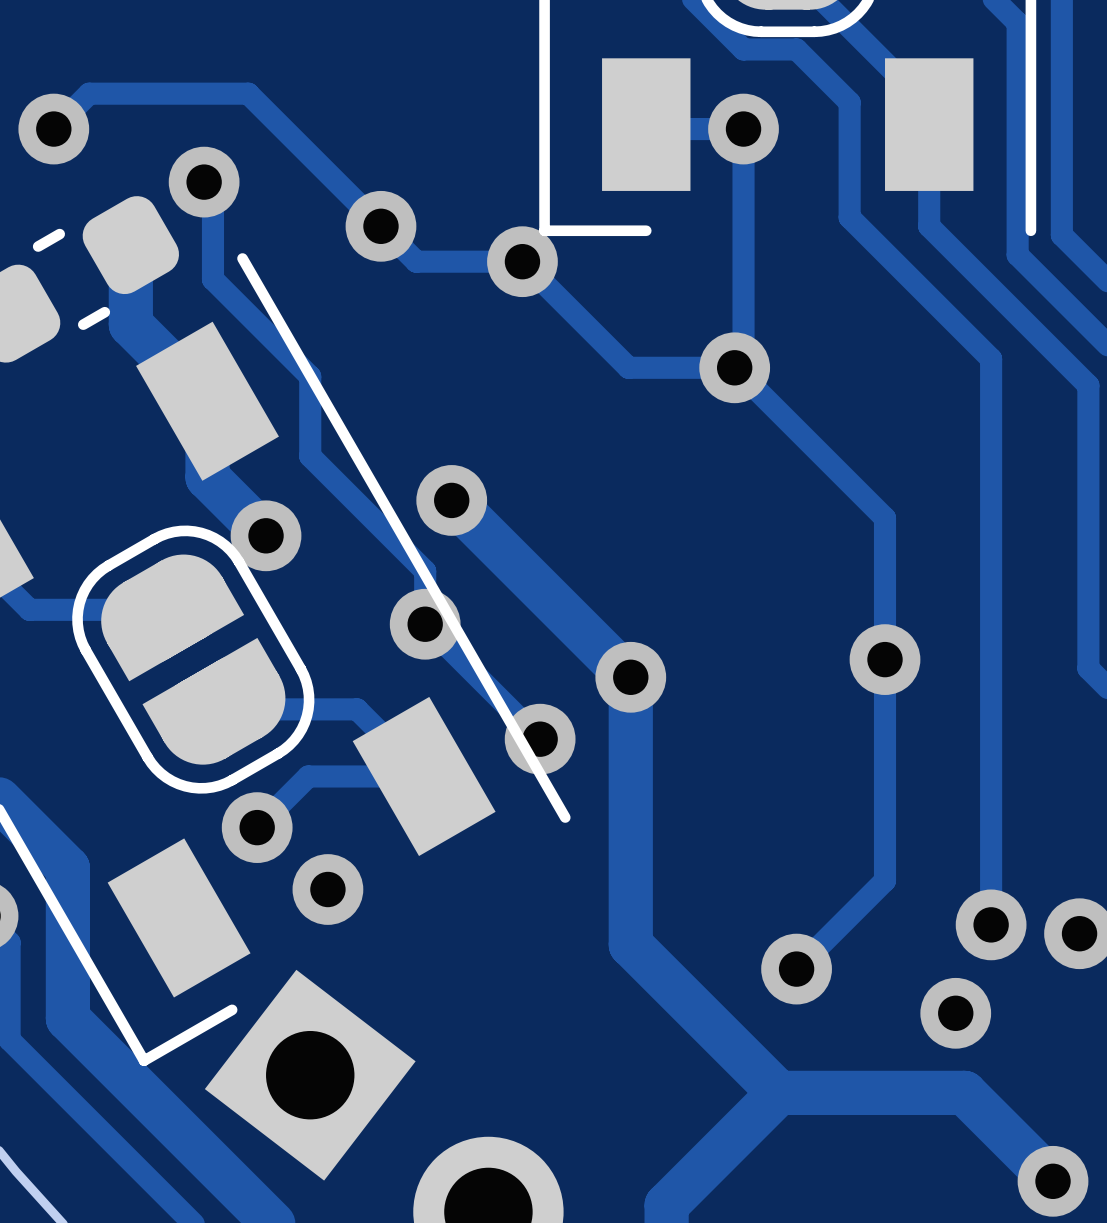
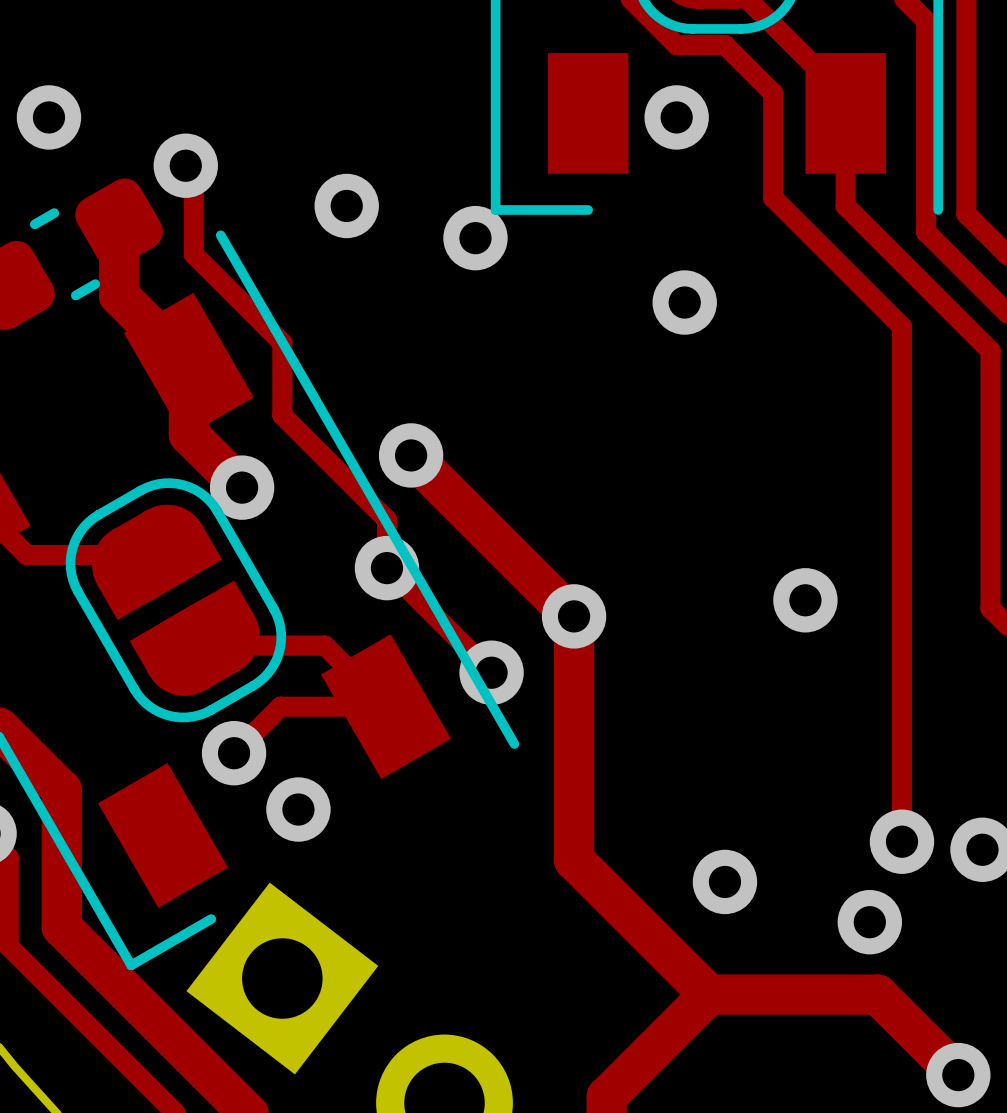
track: (646, 124) (650, 129) (743, 129) (743, 358) (734, 367) -> none
track: (53, 129) (89, 93) (248, 93) (416, 261) (522, 261) (628, 367) (734, 367) -> none
track: (734, 367) (885, 518) (885, 880) (796, 969) -> none
via position: (734, 367) -> (684, 302)

